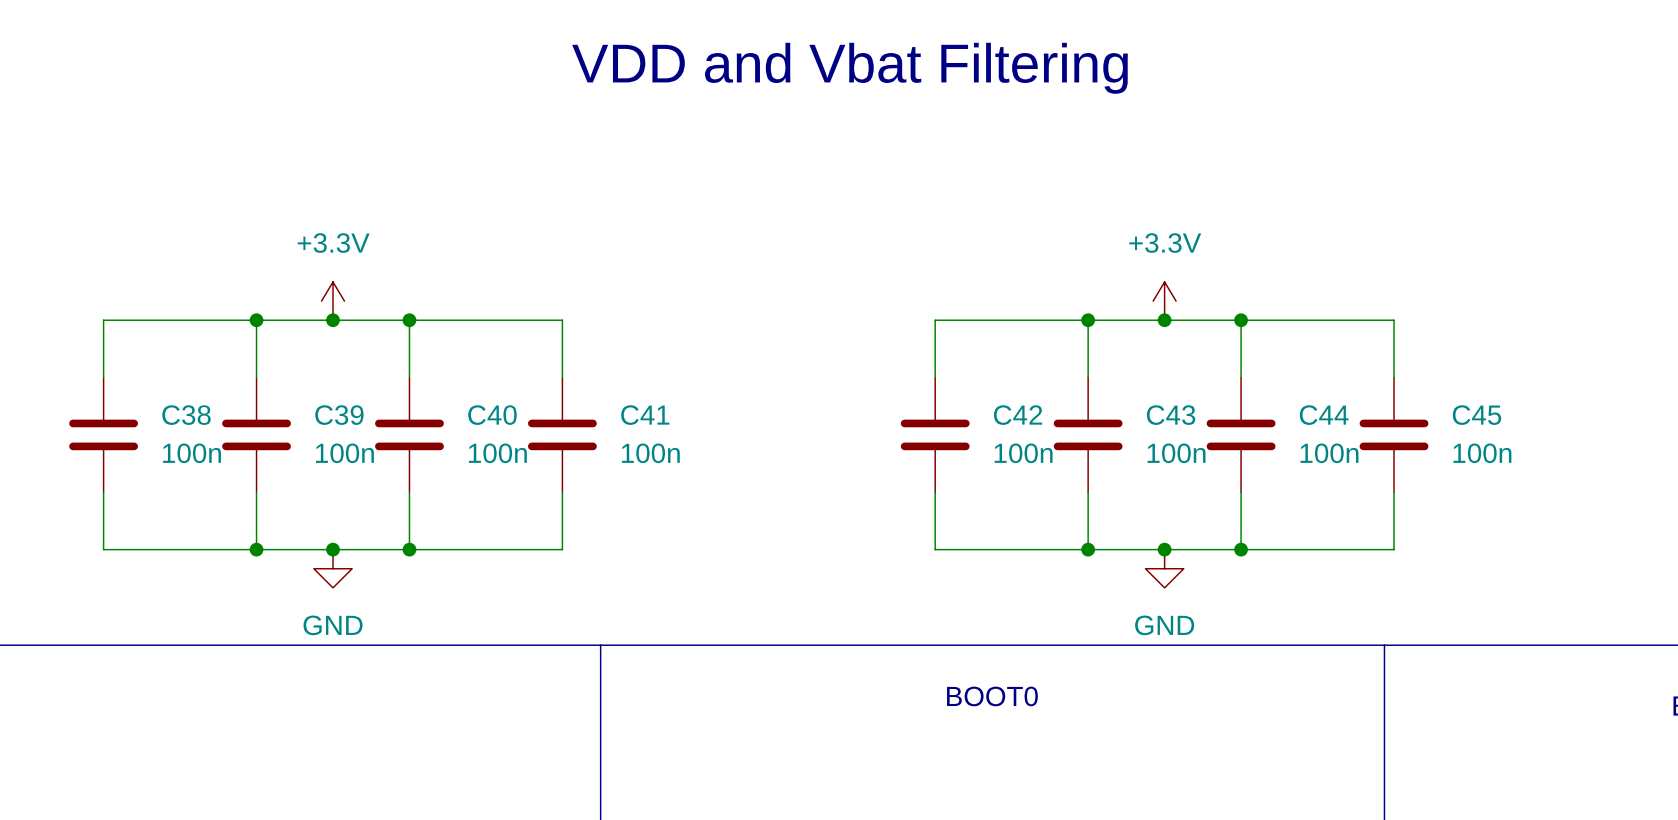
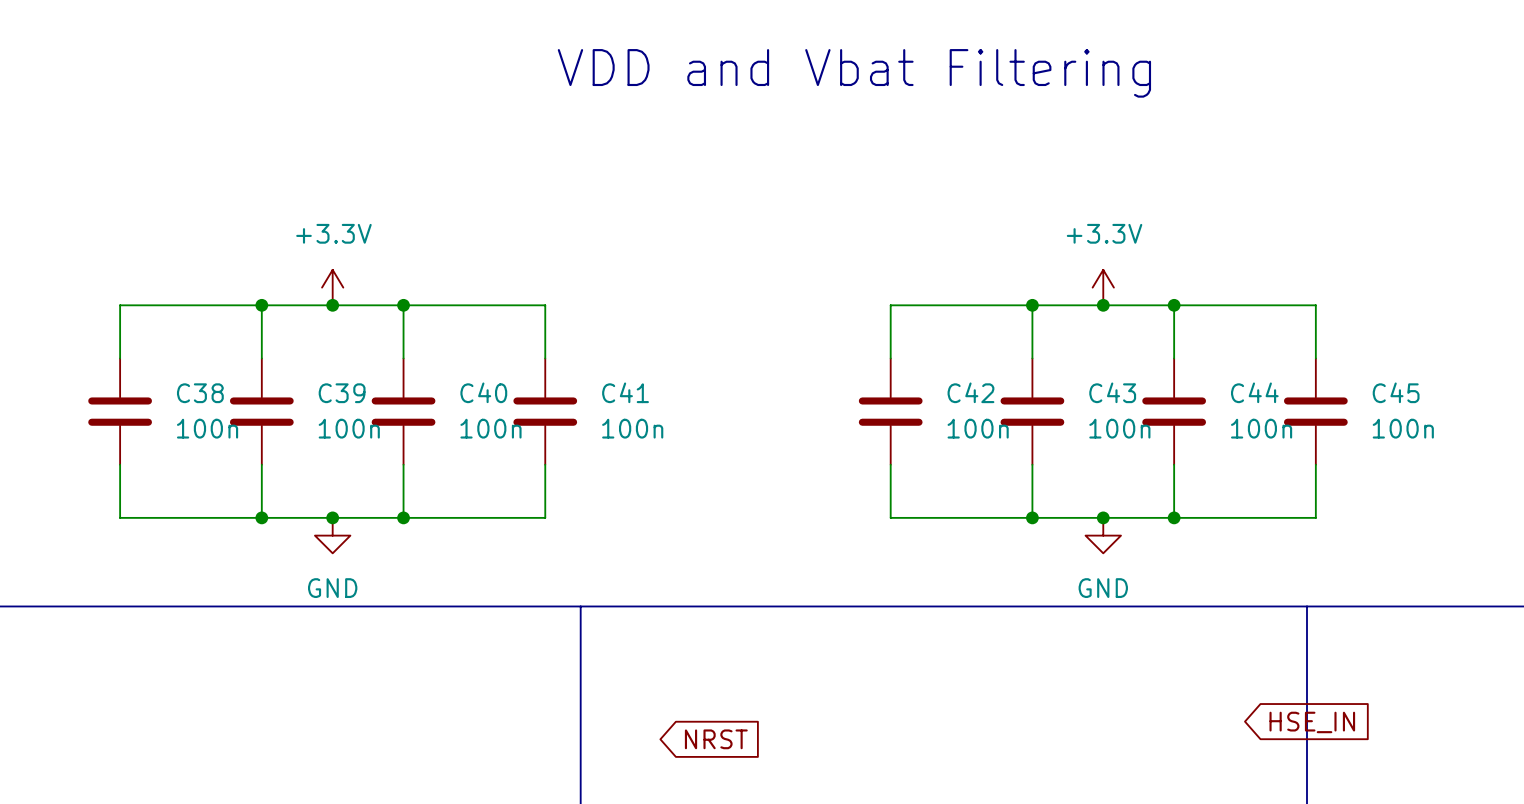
text: BOOT0 (992, 696) -> none
global label: none -> HSE_IN (1312, 722)
global label: none -> NRST (716, 739)

